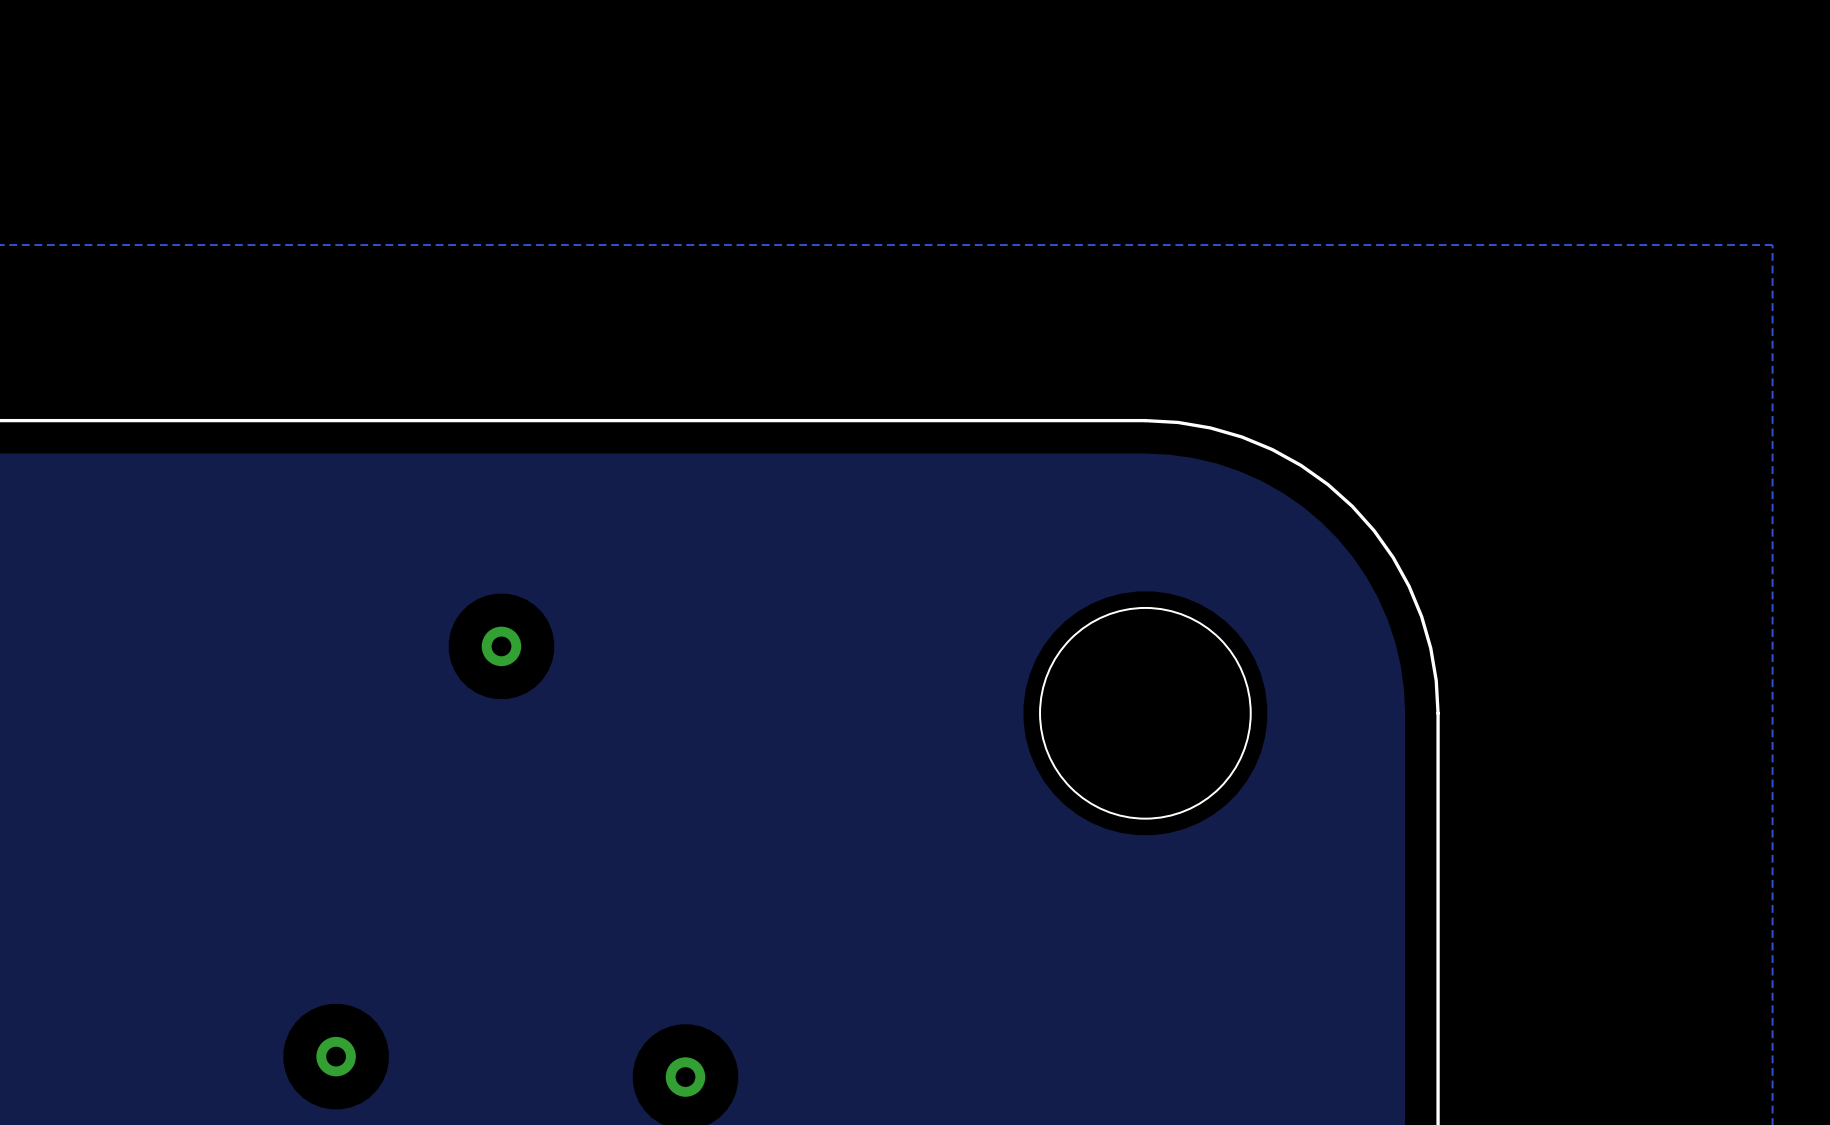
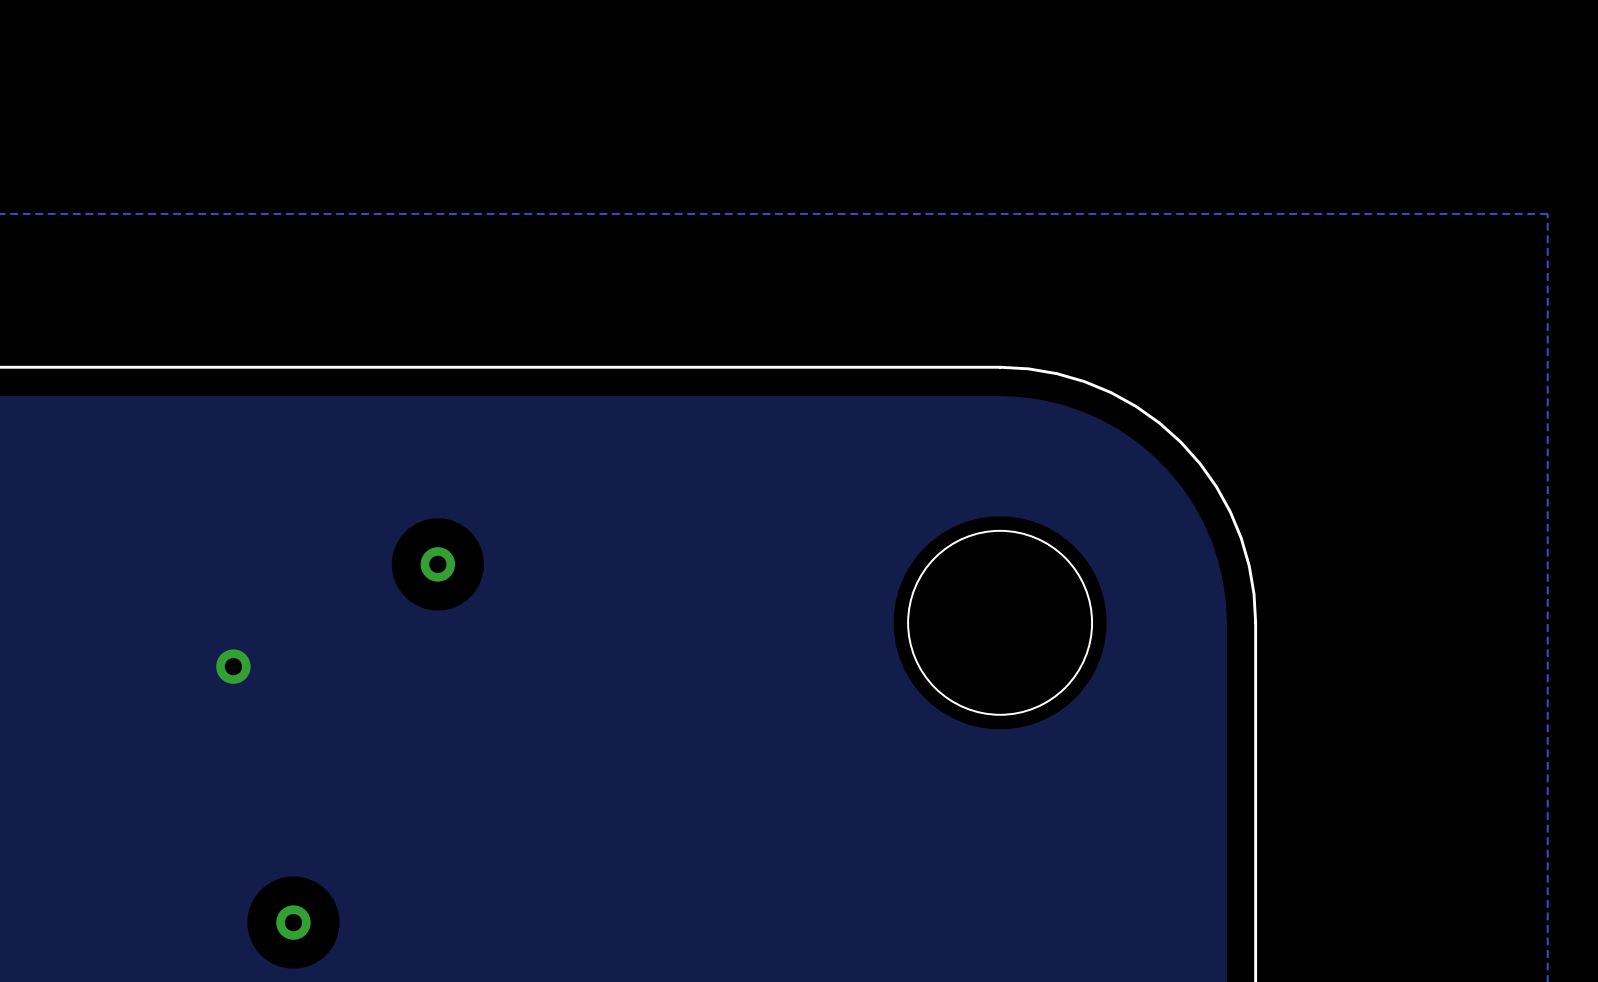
via: none -> (233, 666)
via: (685, 1077) -> none

